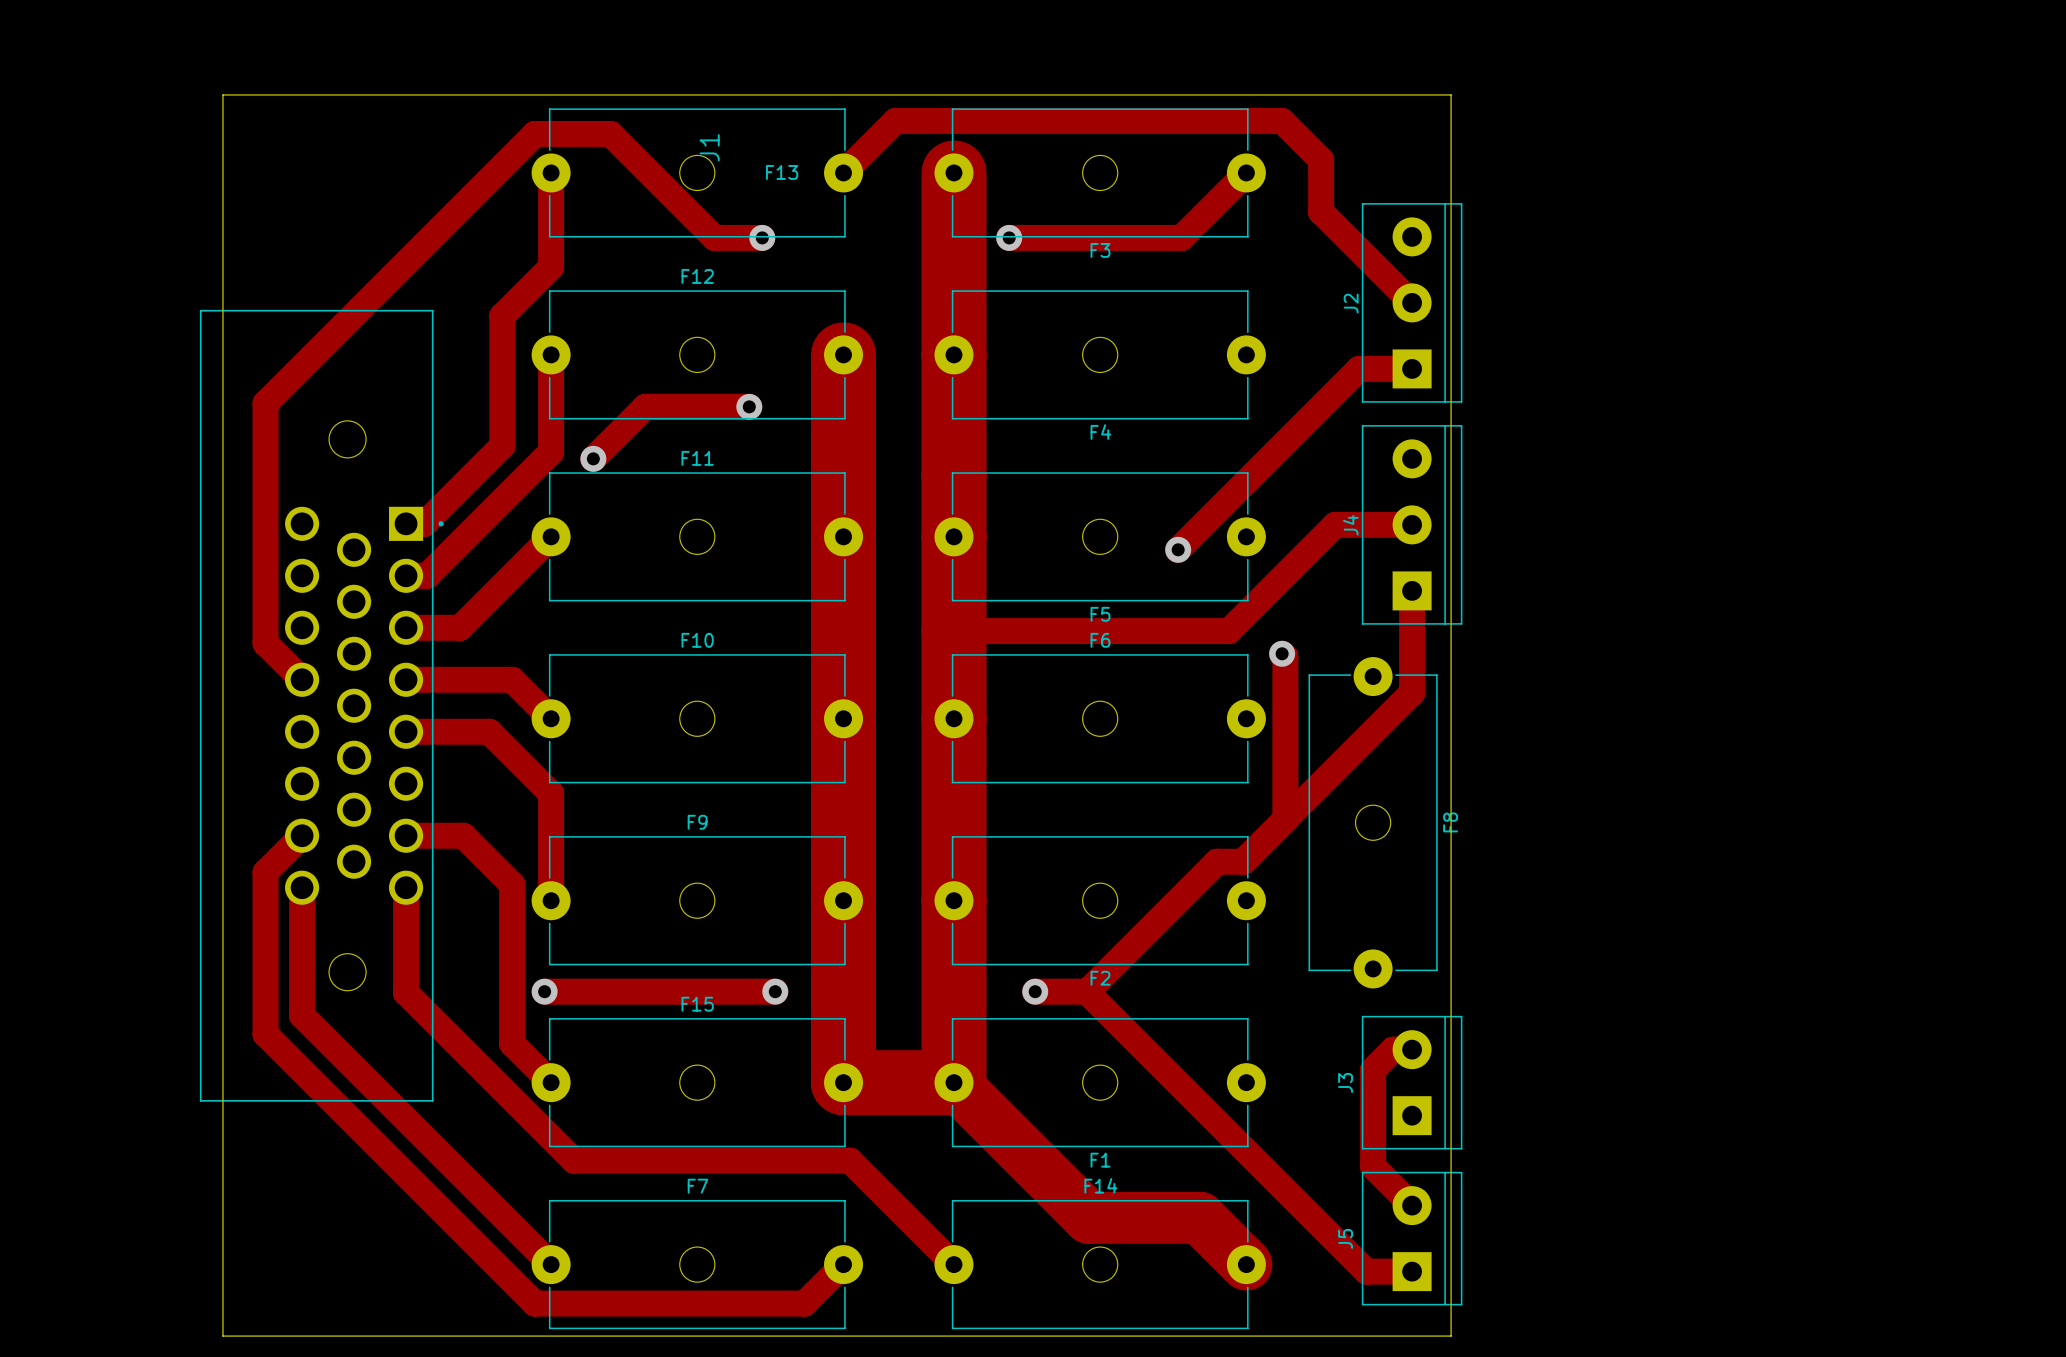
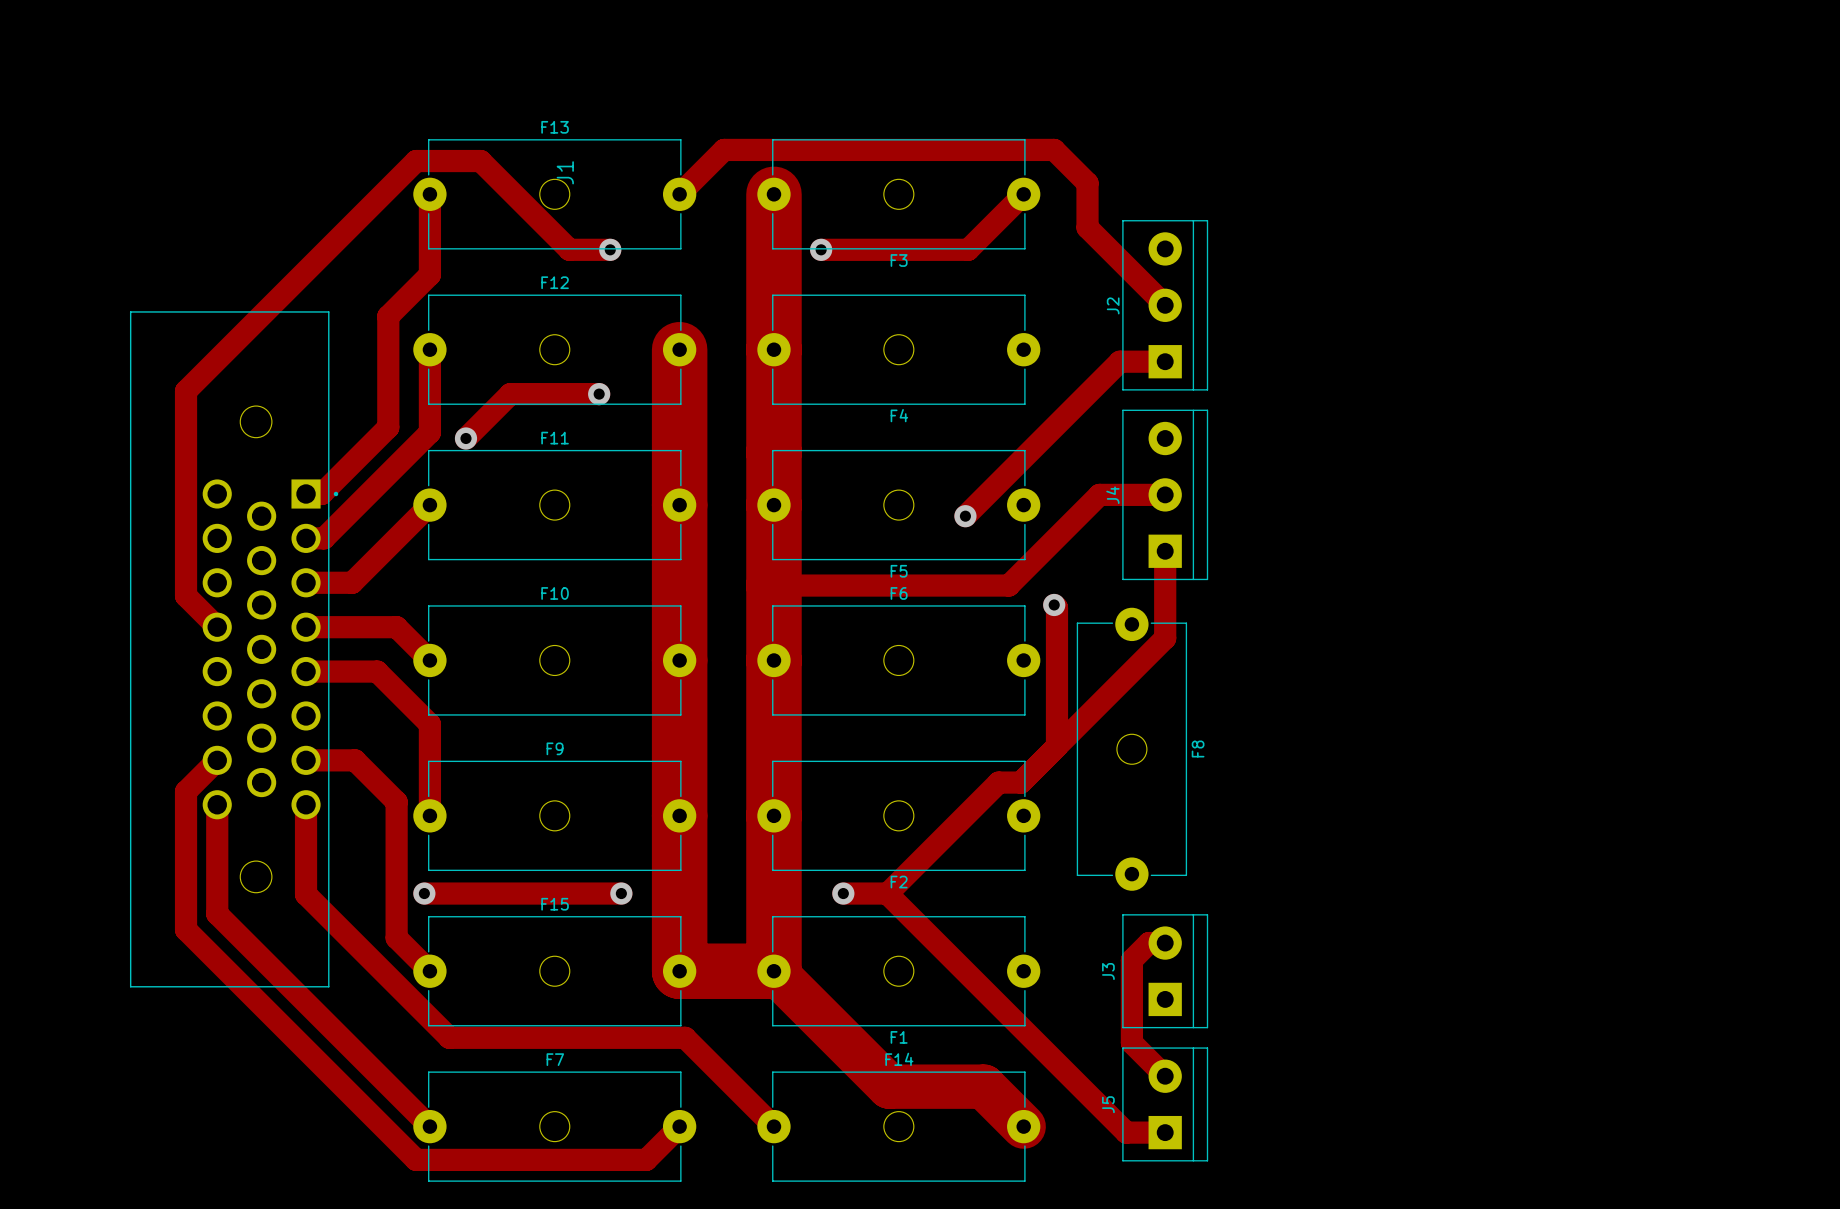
board edge: (222, 94) (1451, 94) (1451, 1336) (222, 1336) (222, 94) -> none
F13 name position: F13 (782, 172) -> F13 (555, 127)

